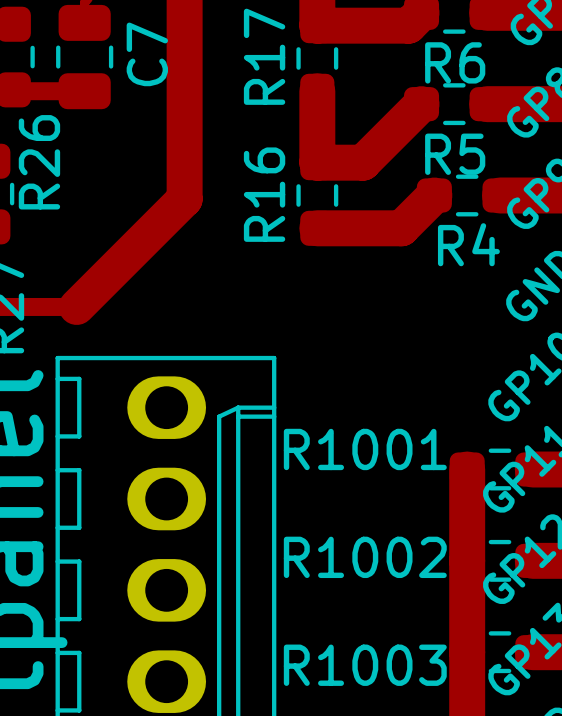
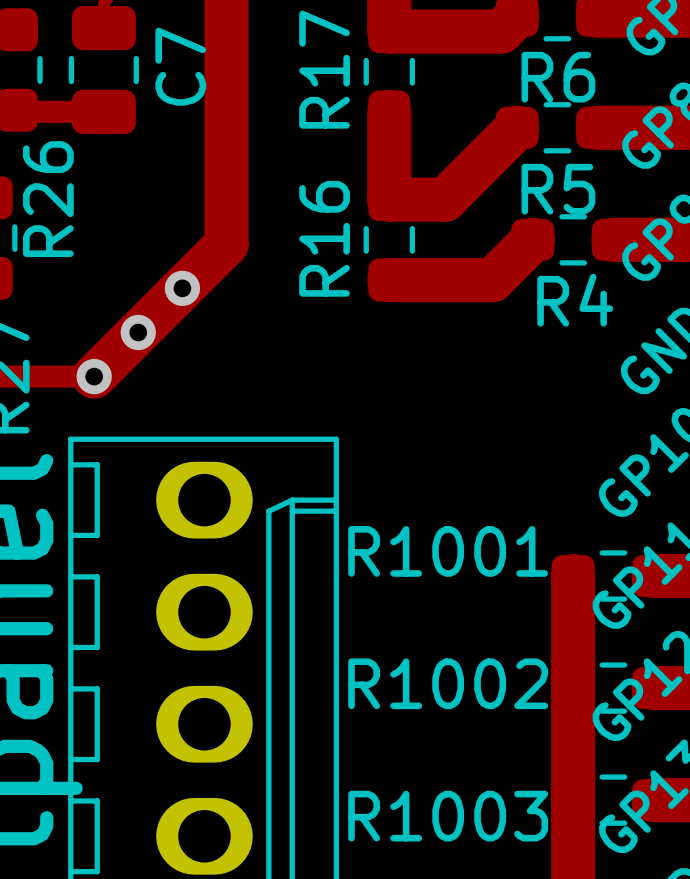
via: none -> (182, 288)
via: none -> (138, 332)
via: none -> (94, 376)

